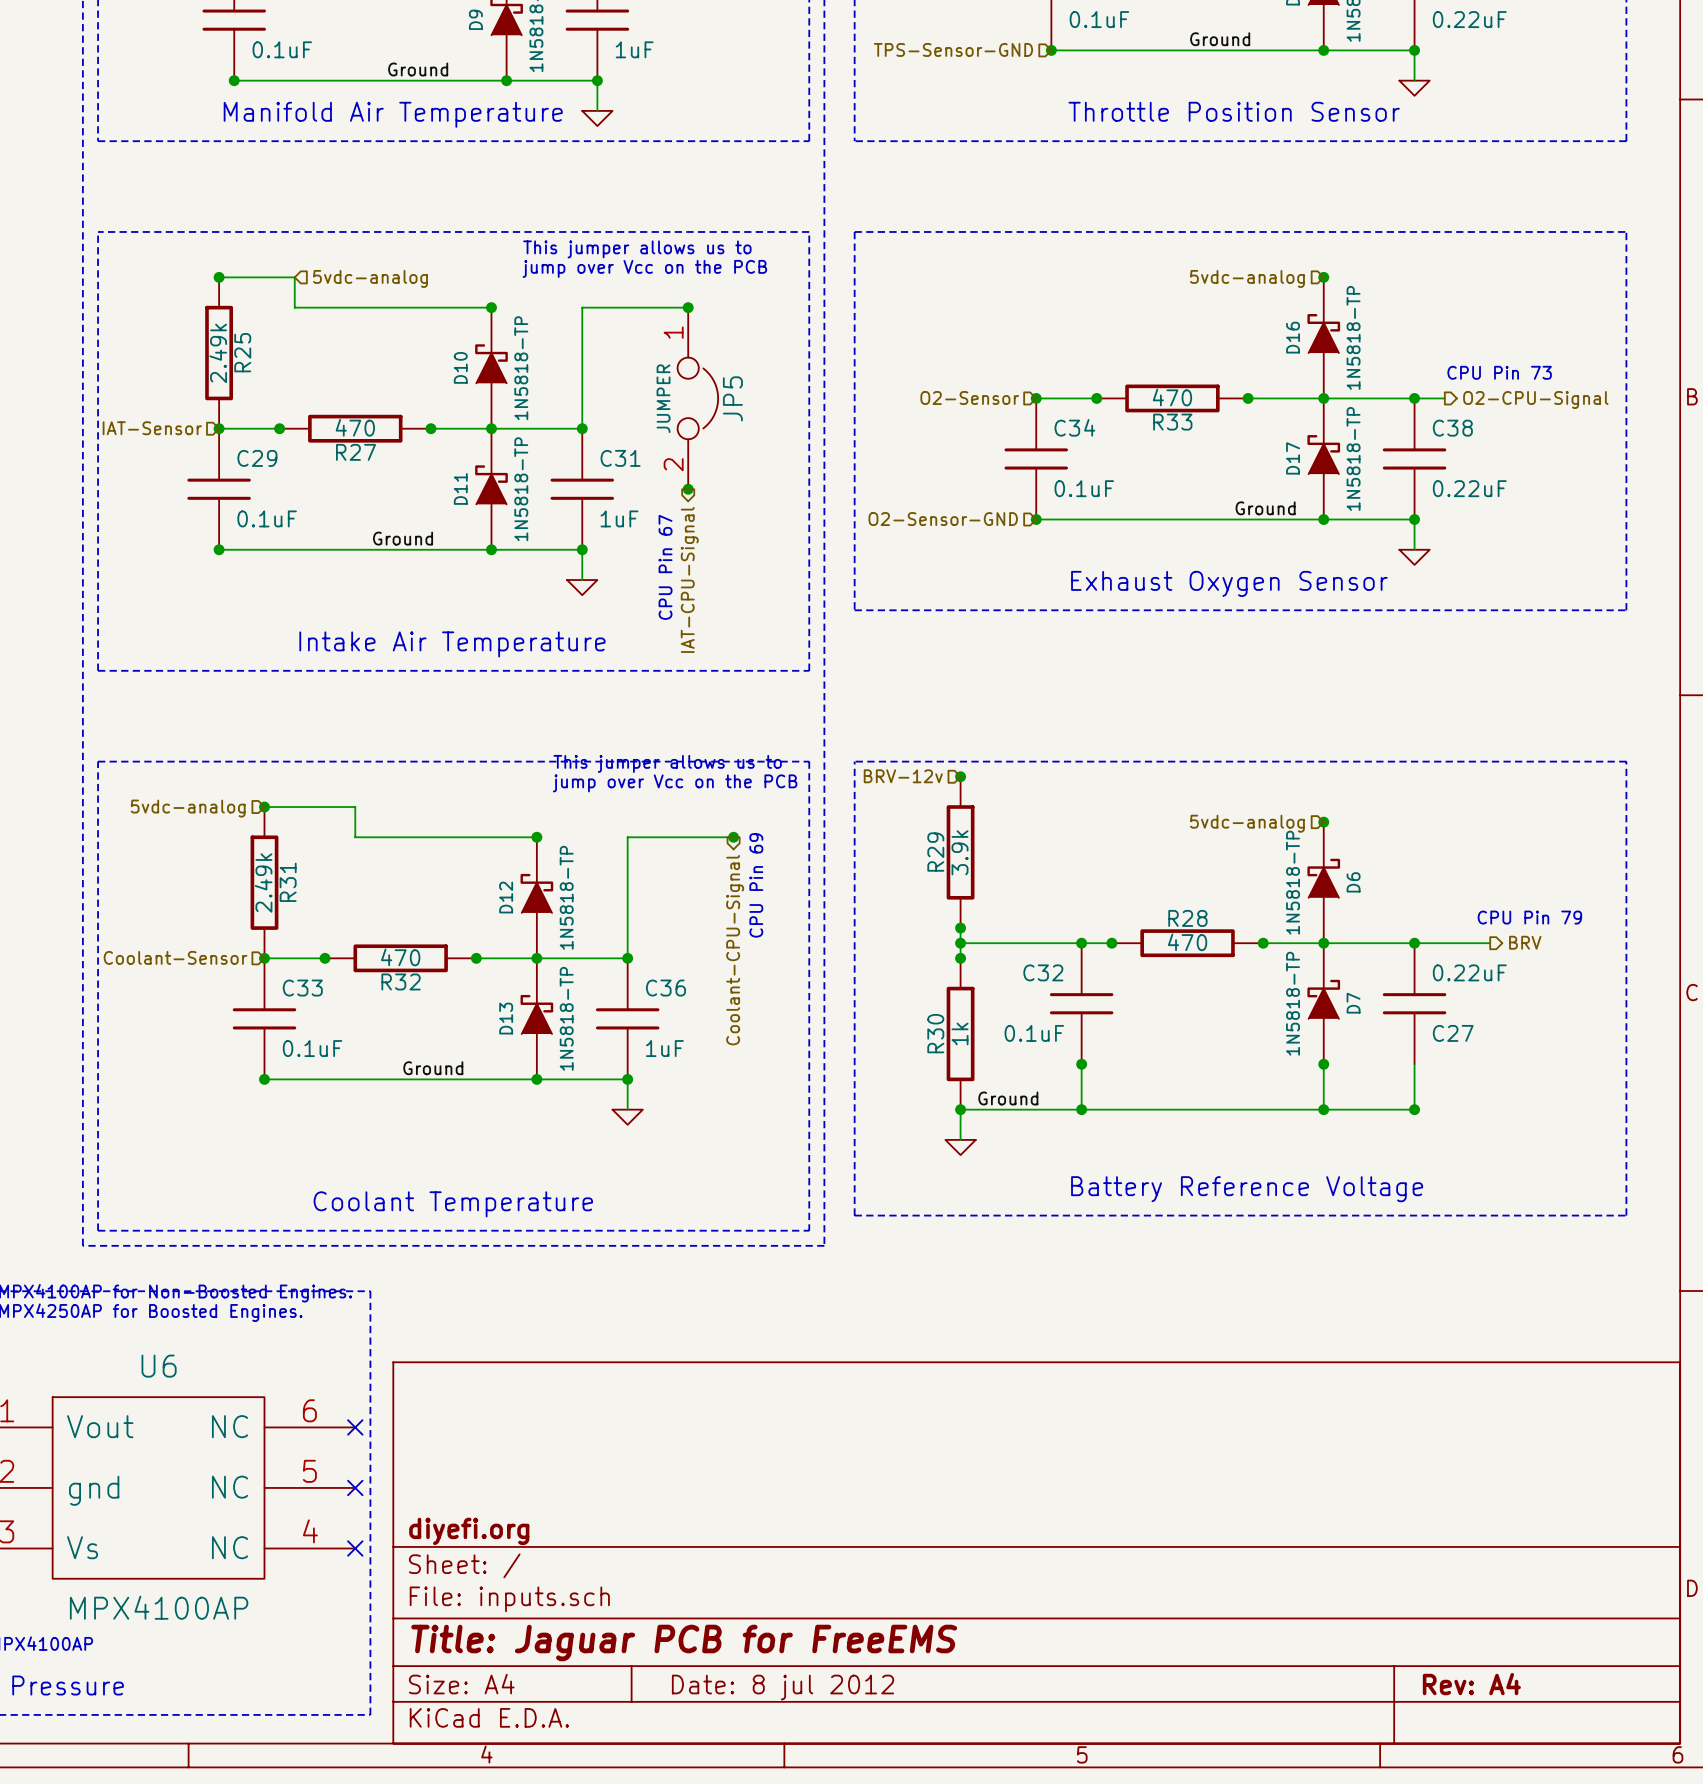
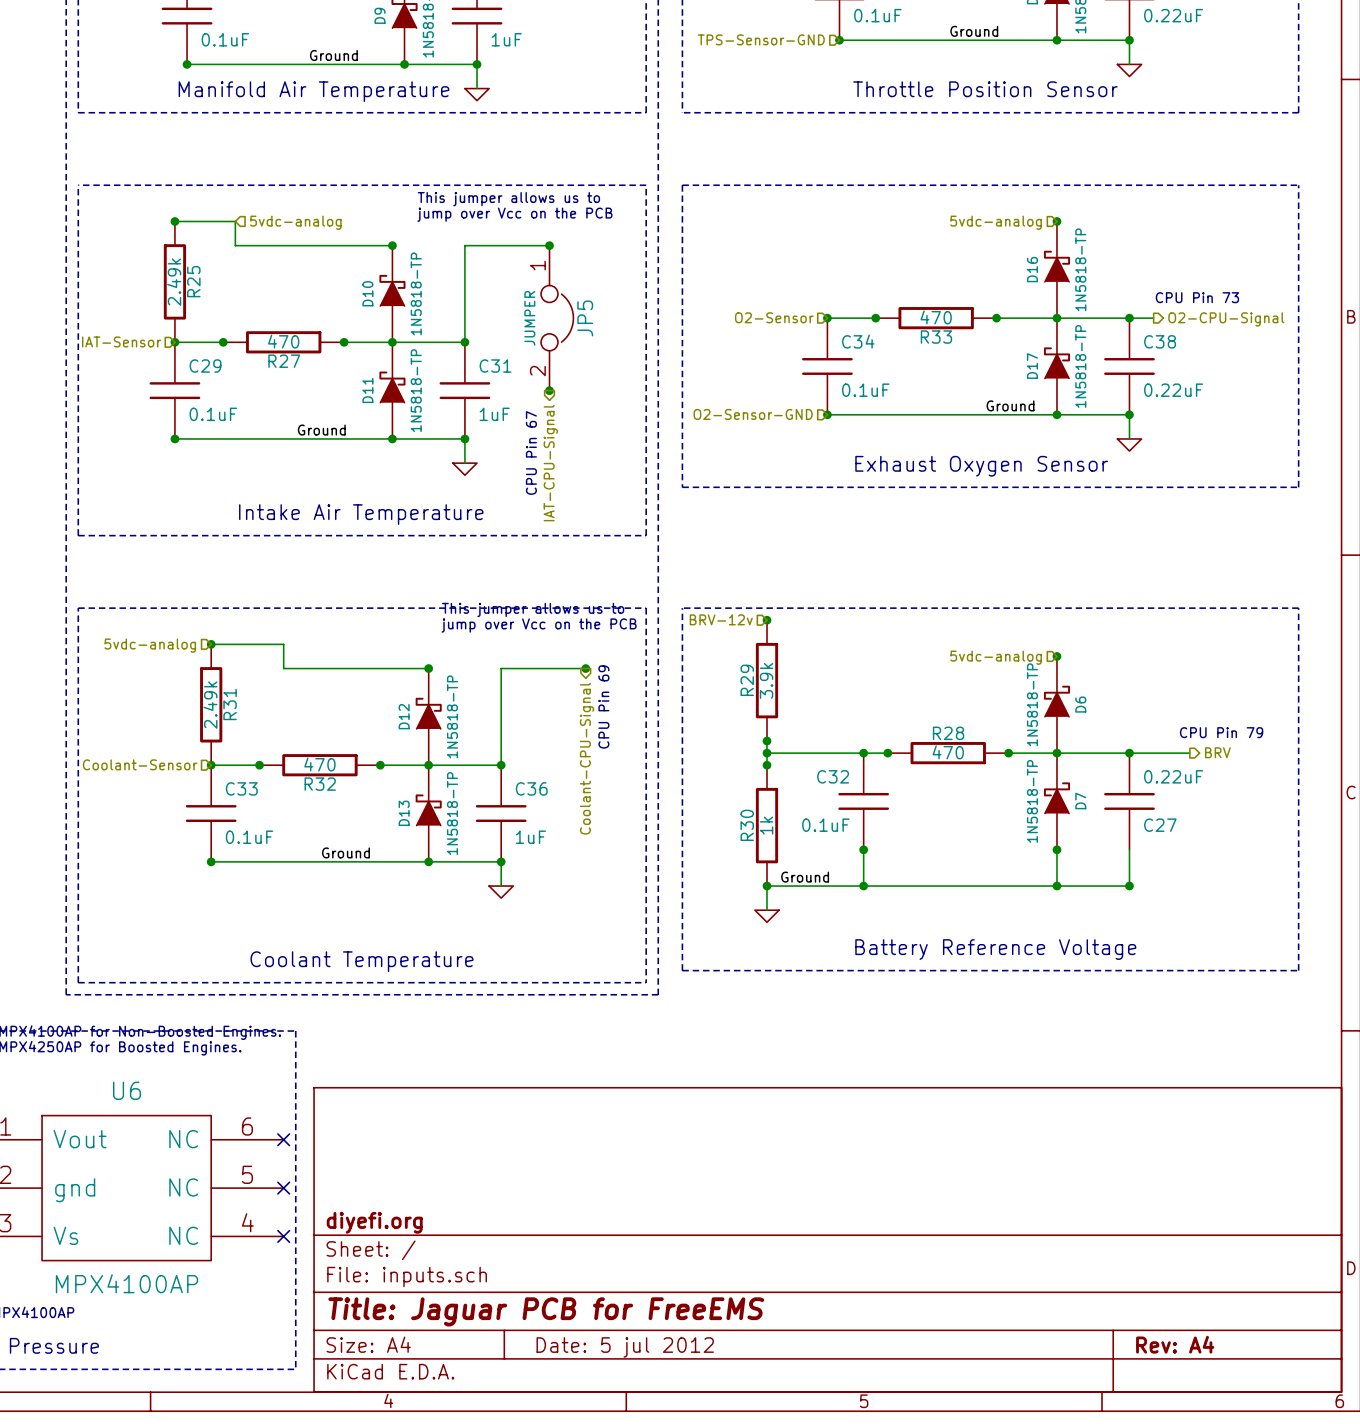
title block: Date: 8 jul 2012 (783, 1687) -> Date: 5 jul 2012 (625, 1347)

